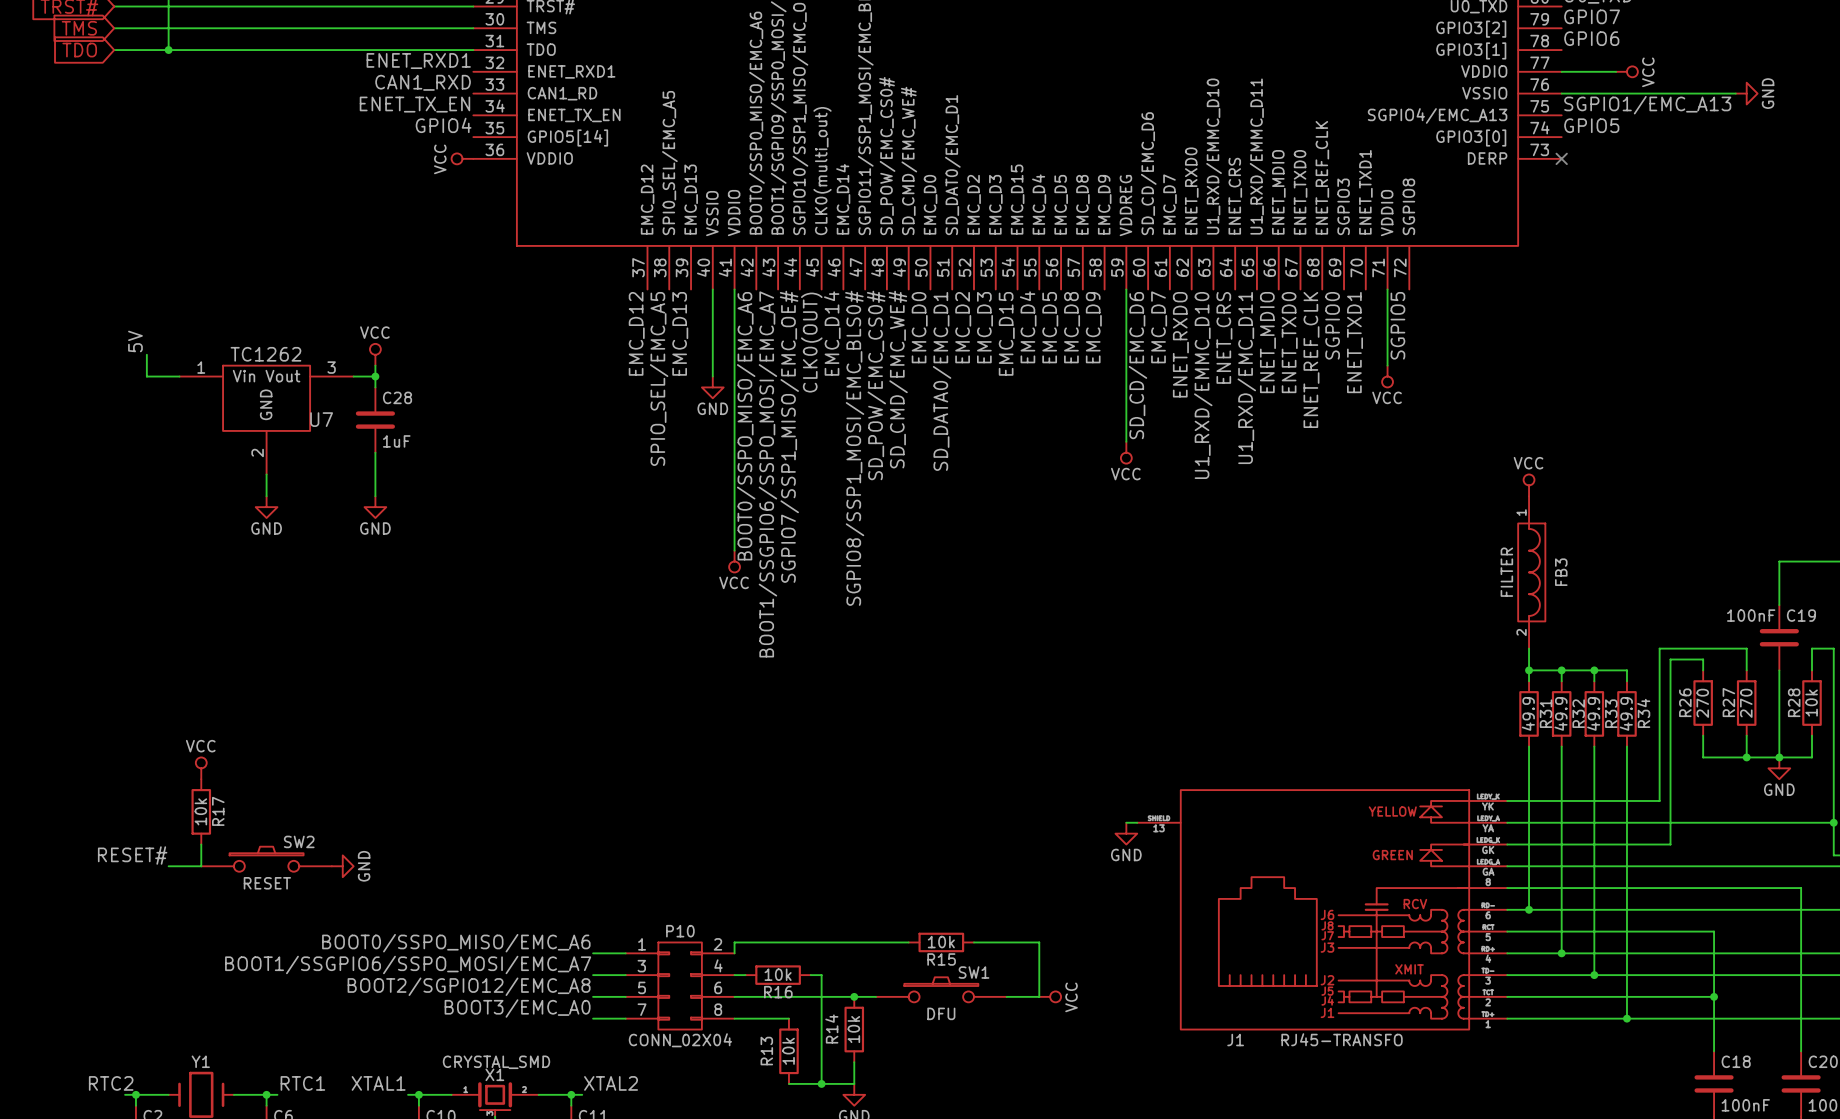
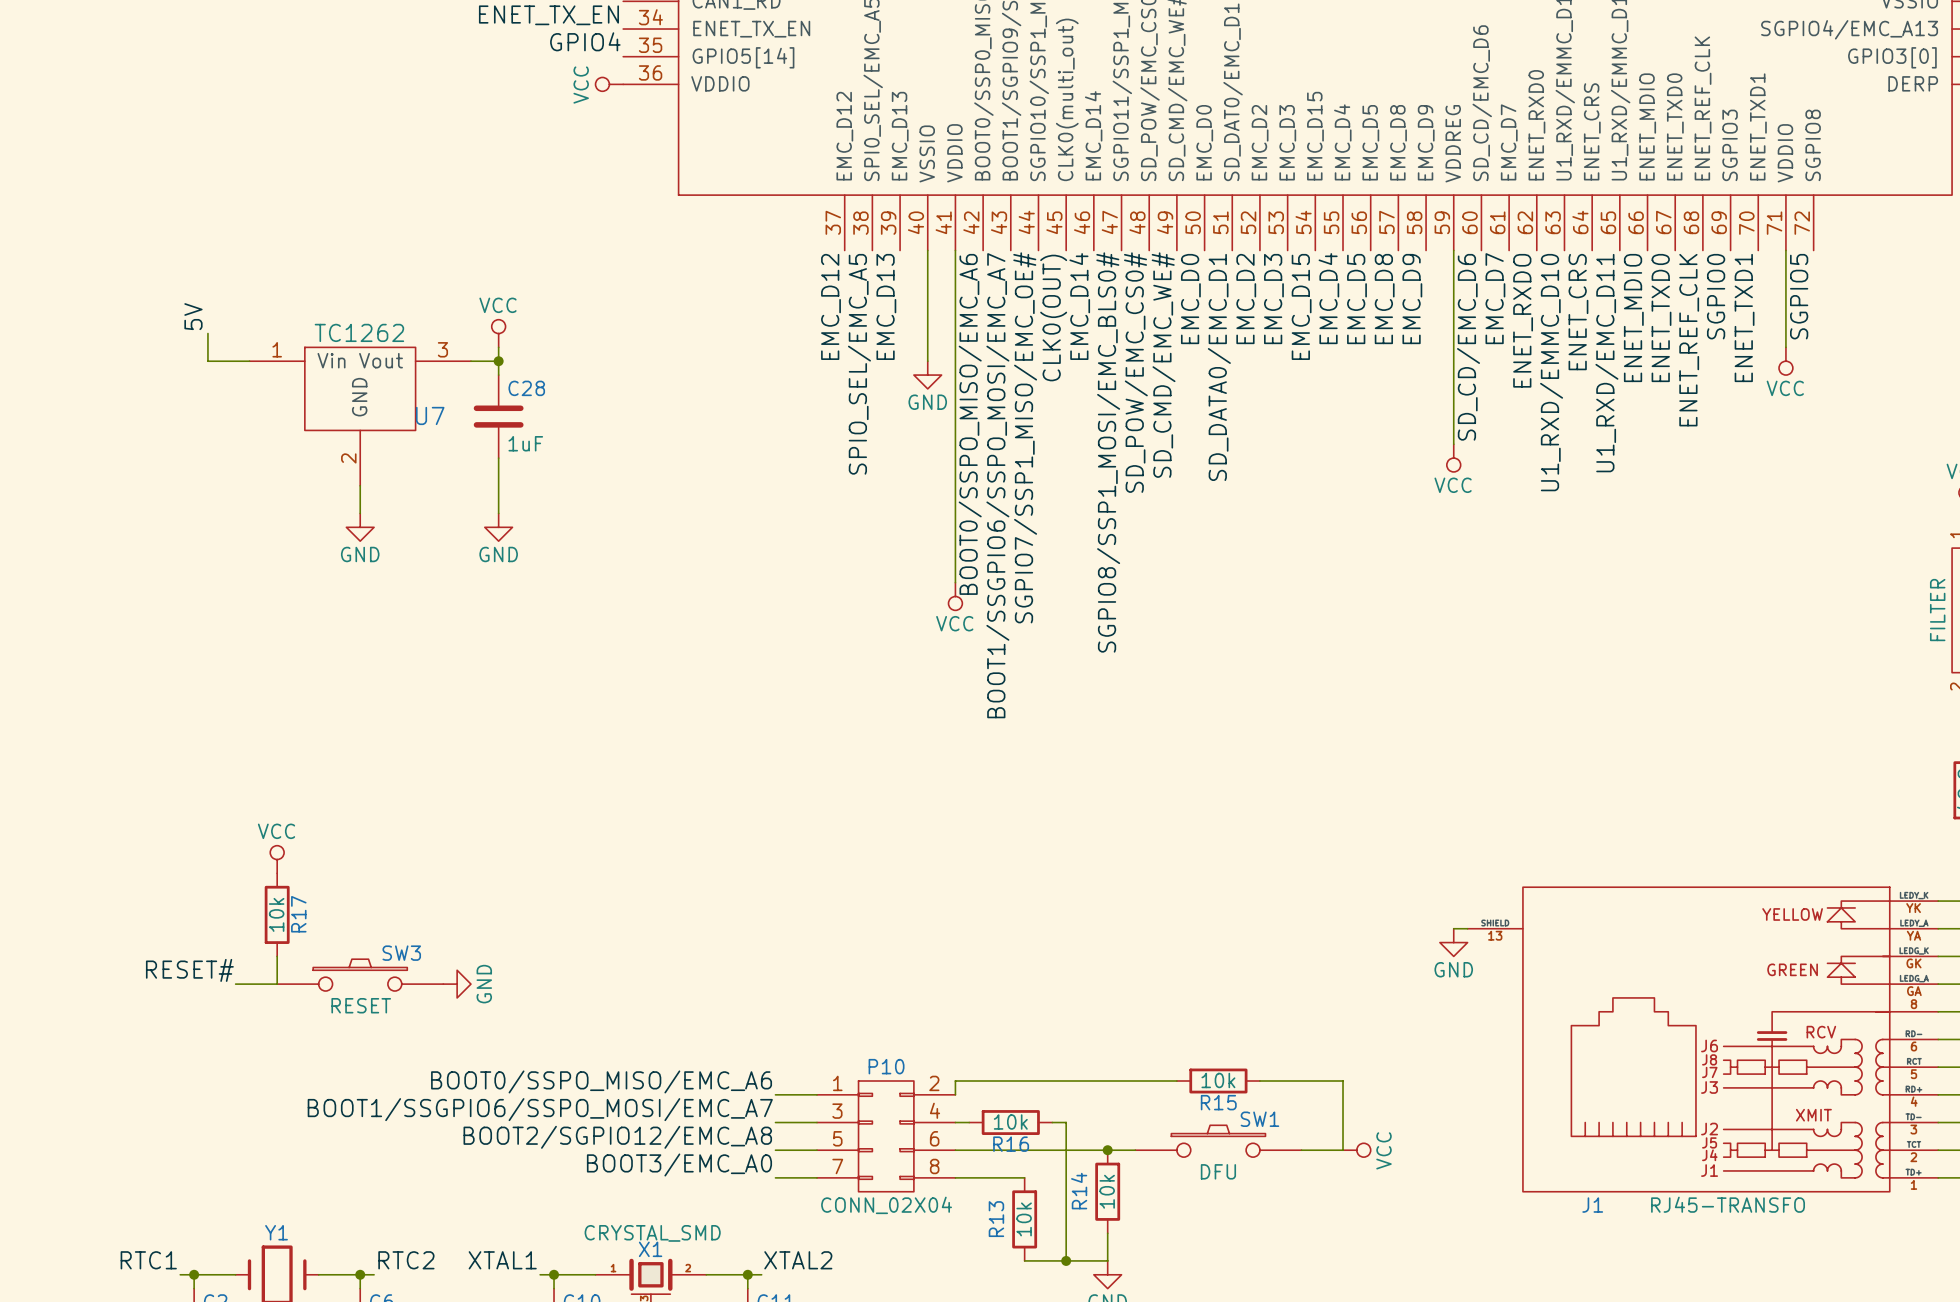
SW2 name: SW2 (299, 841) -> SW3 (401, 953)
label: RTC2 (111, 1083) -> RTC1 (148, 1260)
label: RTC1 (302, 1083) -> RTC2 (406, 1260)

